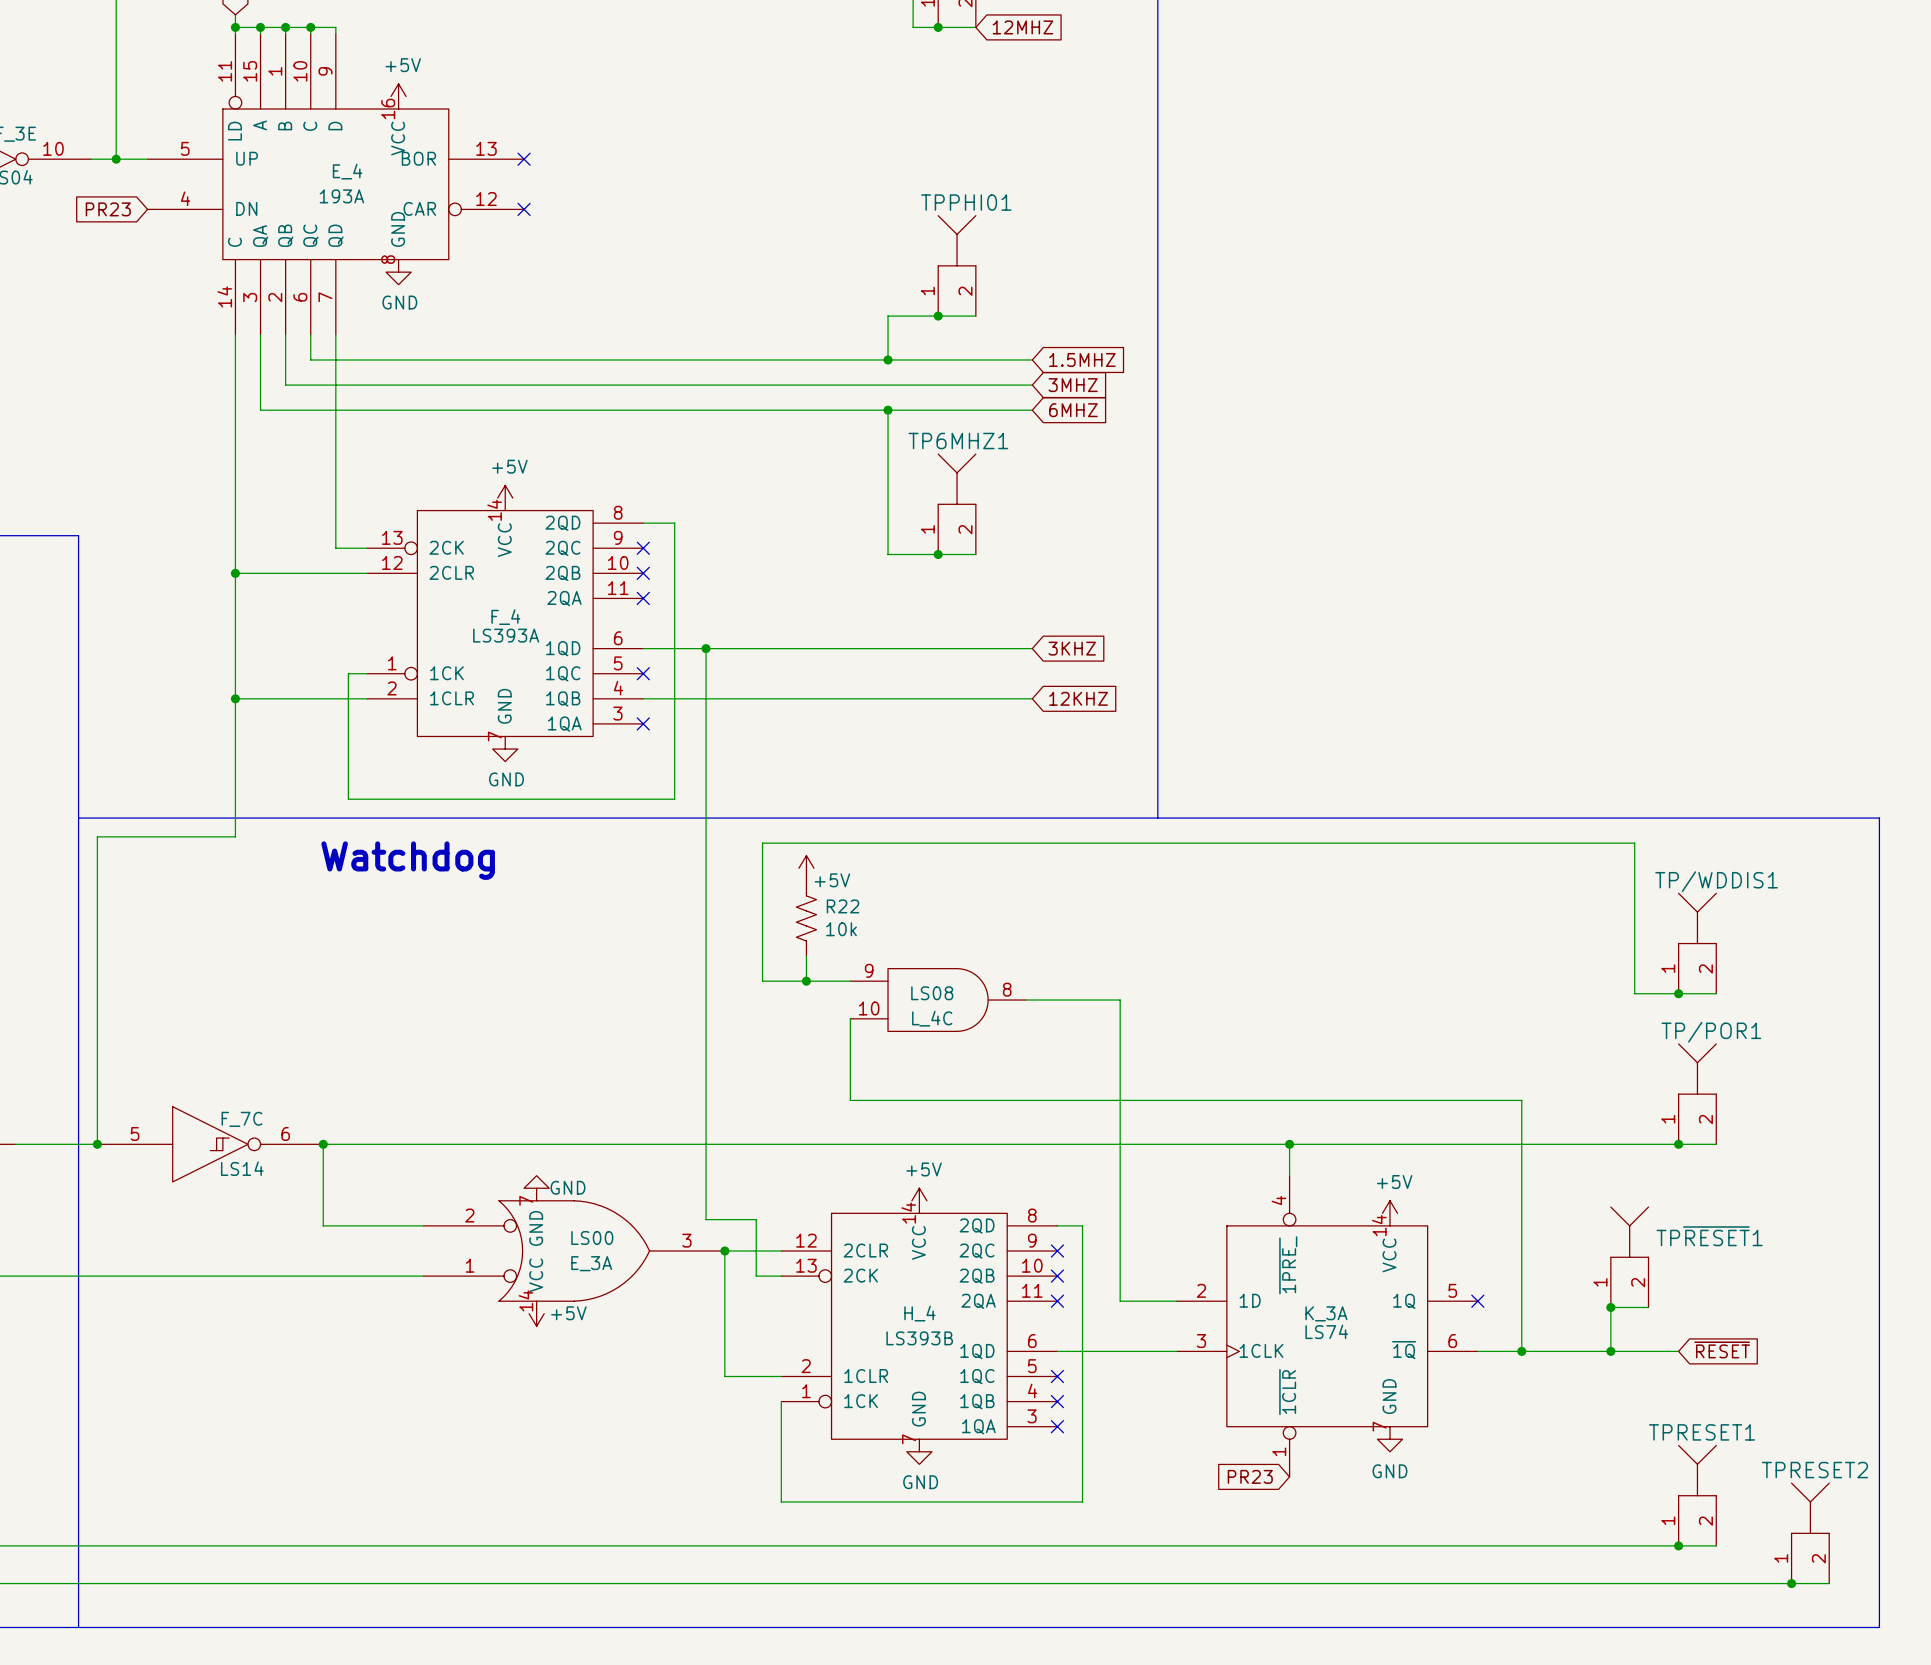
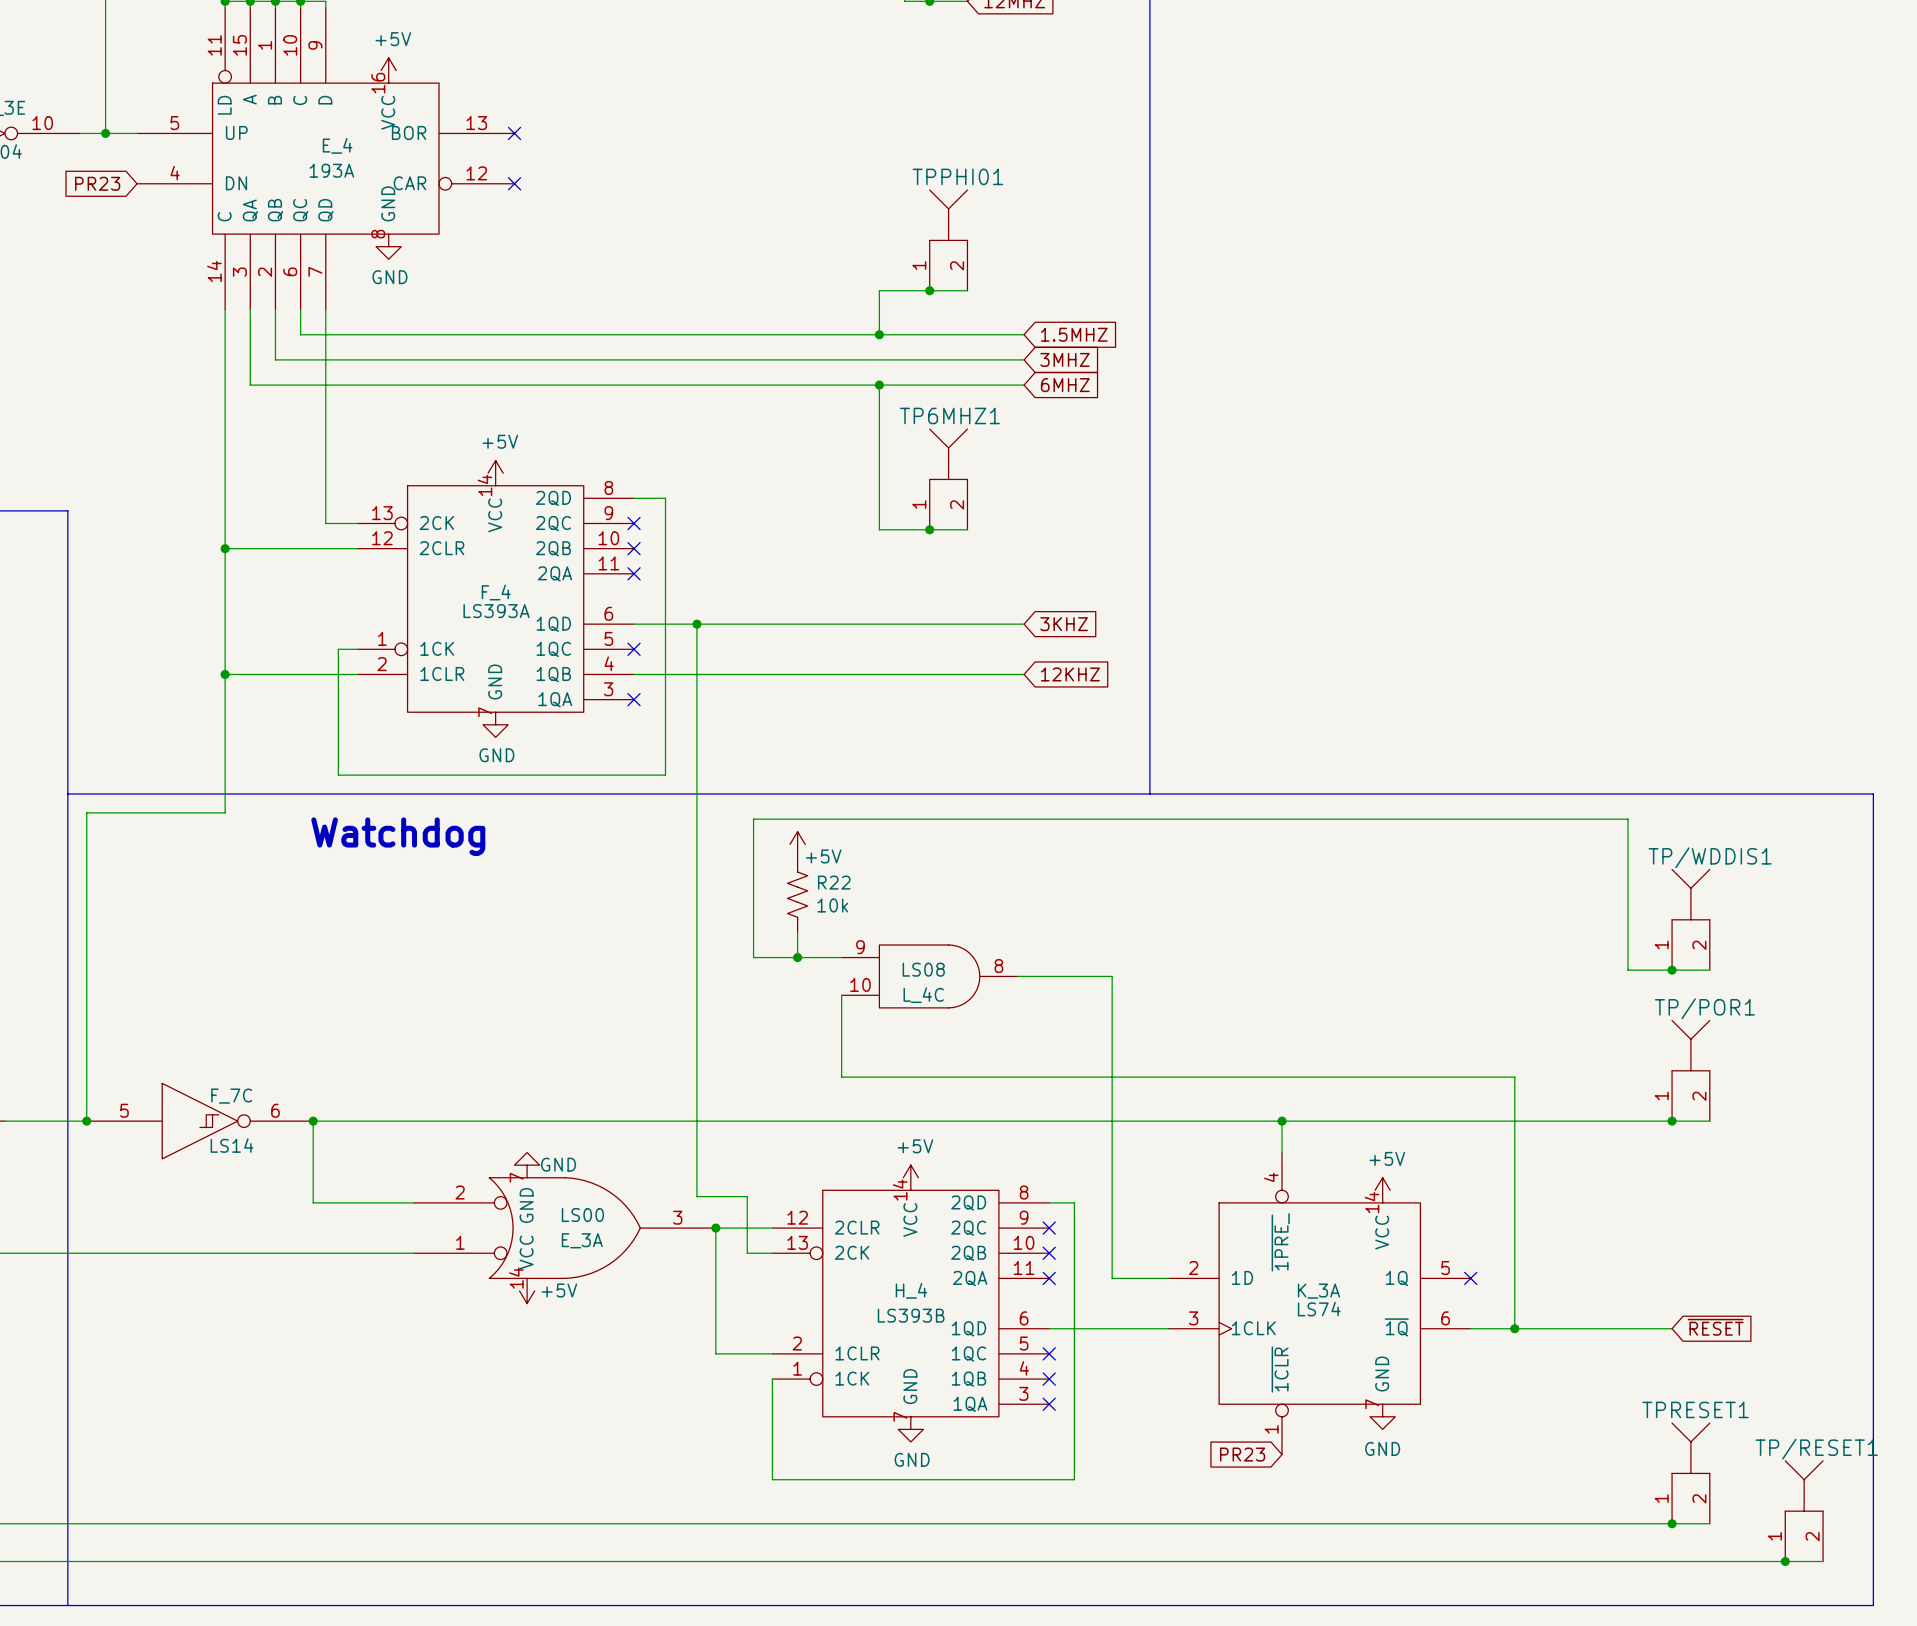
TP~{RESET}1: (1629, 1257) -> none
junction: (1610, 1307) -> none
wire: (1648, 1307) (1610, 1307) (1610, 1351) -> none
junction: (1610, 1351) -> none
TPRESET2 name: TPRESET2 (1814, 1470) -> TP/RESET1 (1816, 1449)

